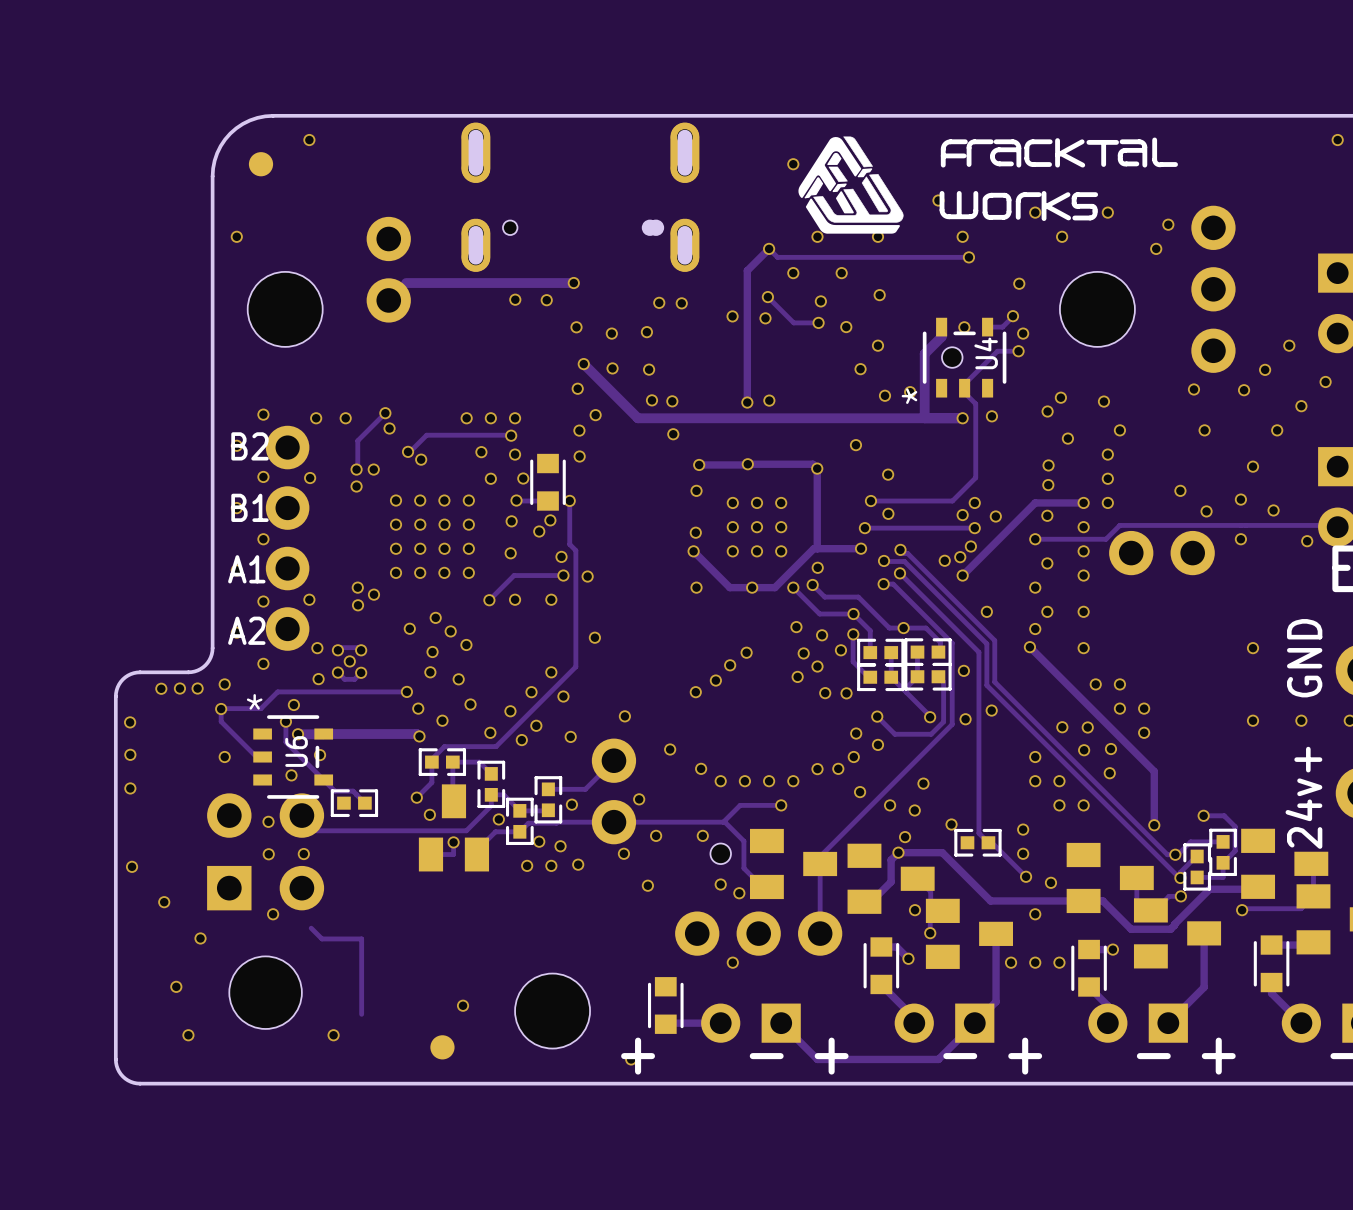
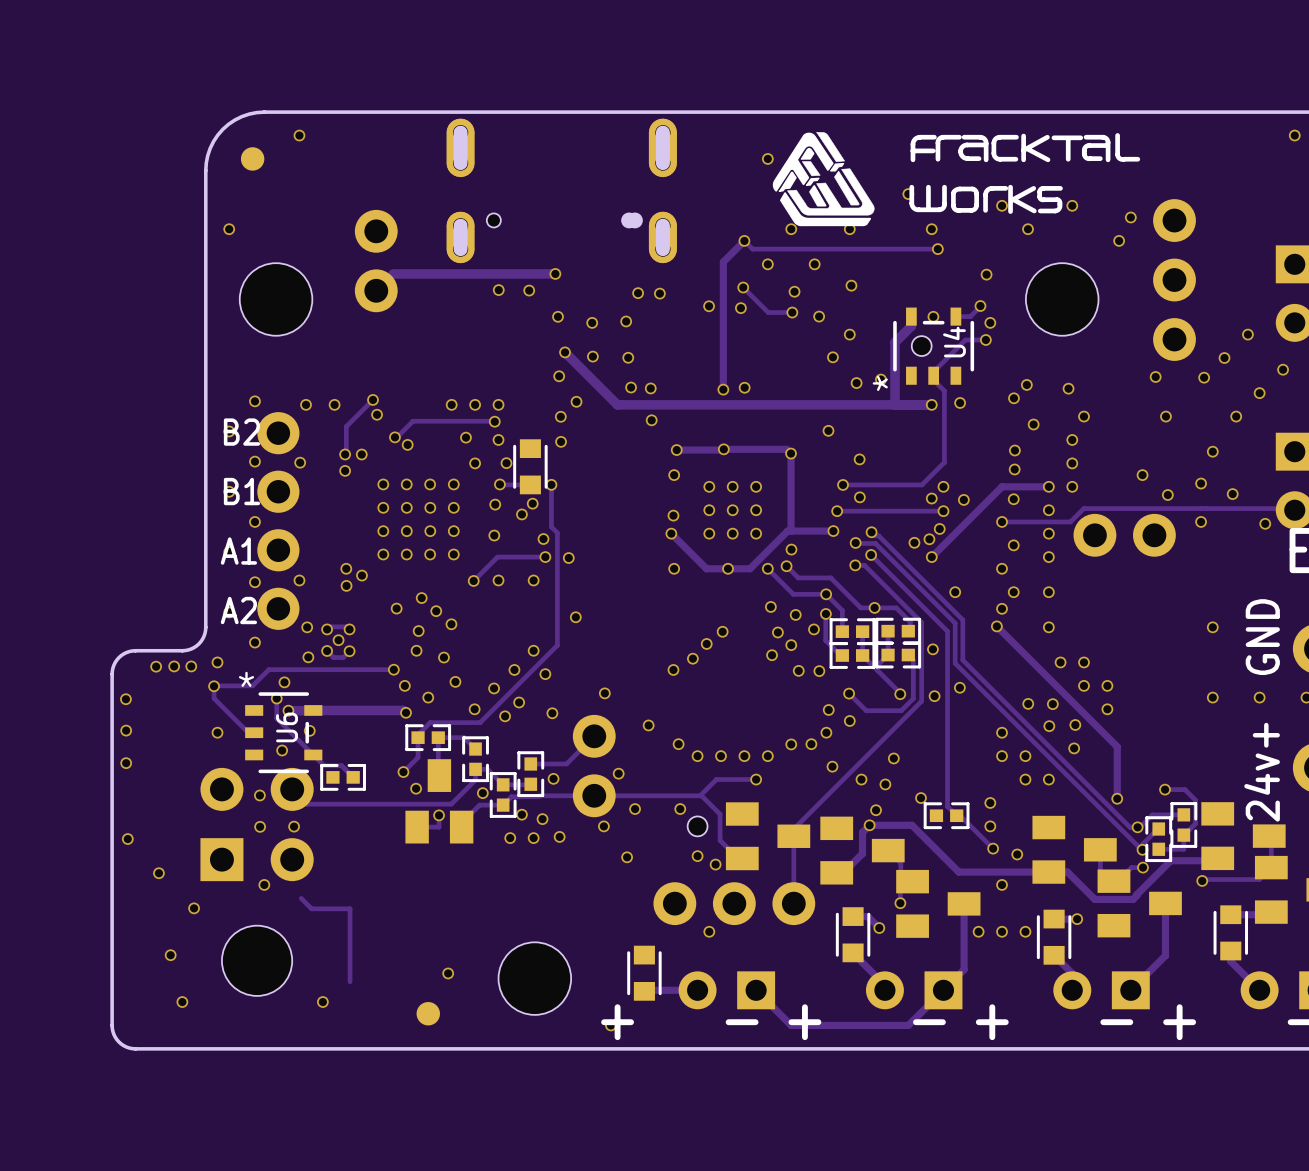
via: (915, 910) -> none

